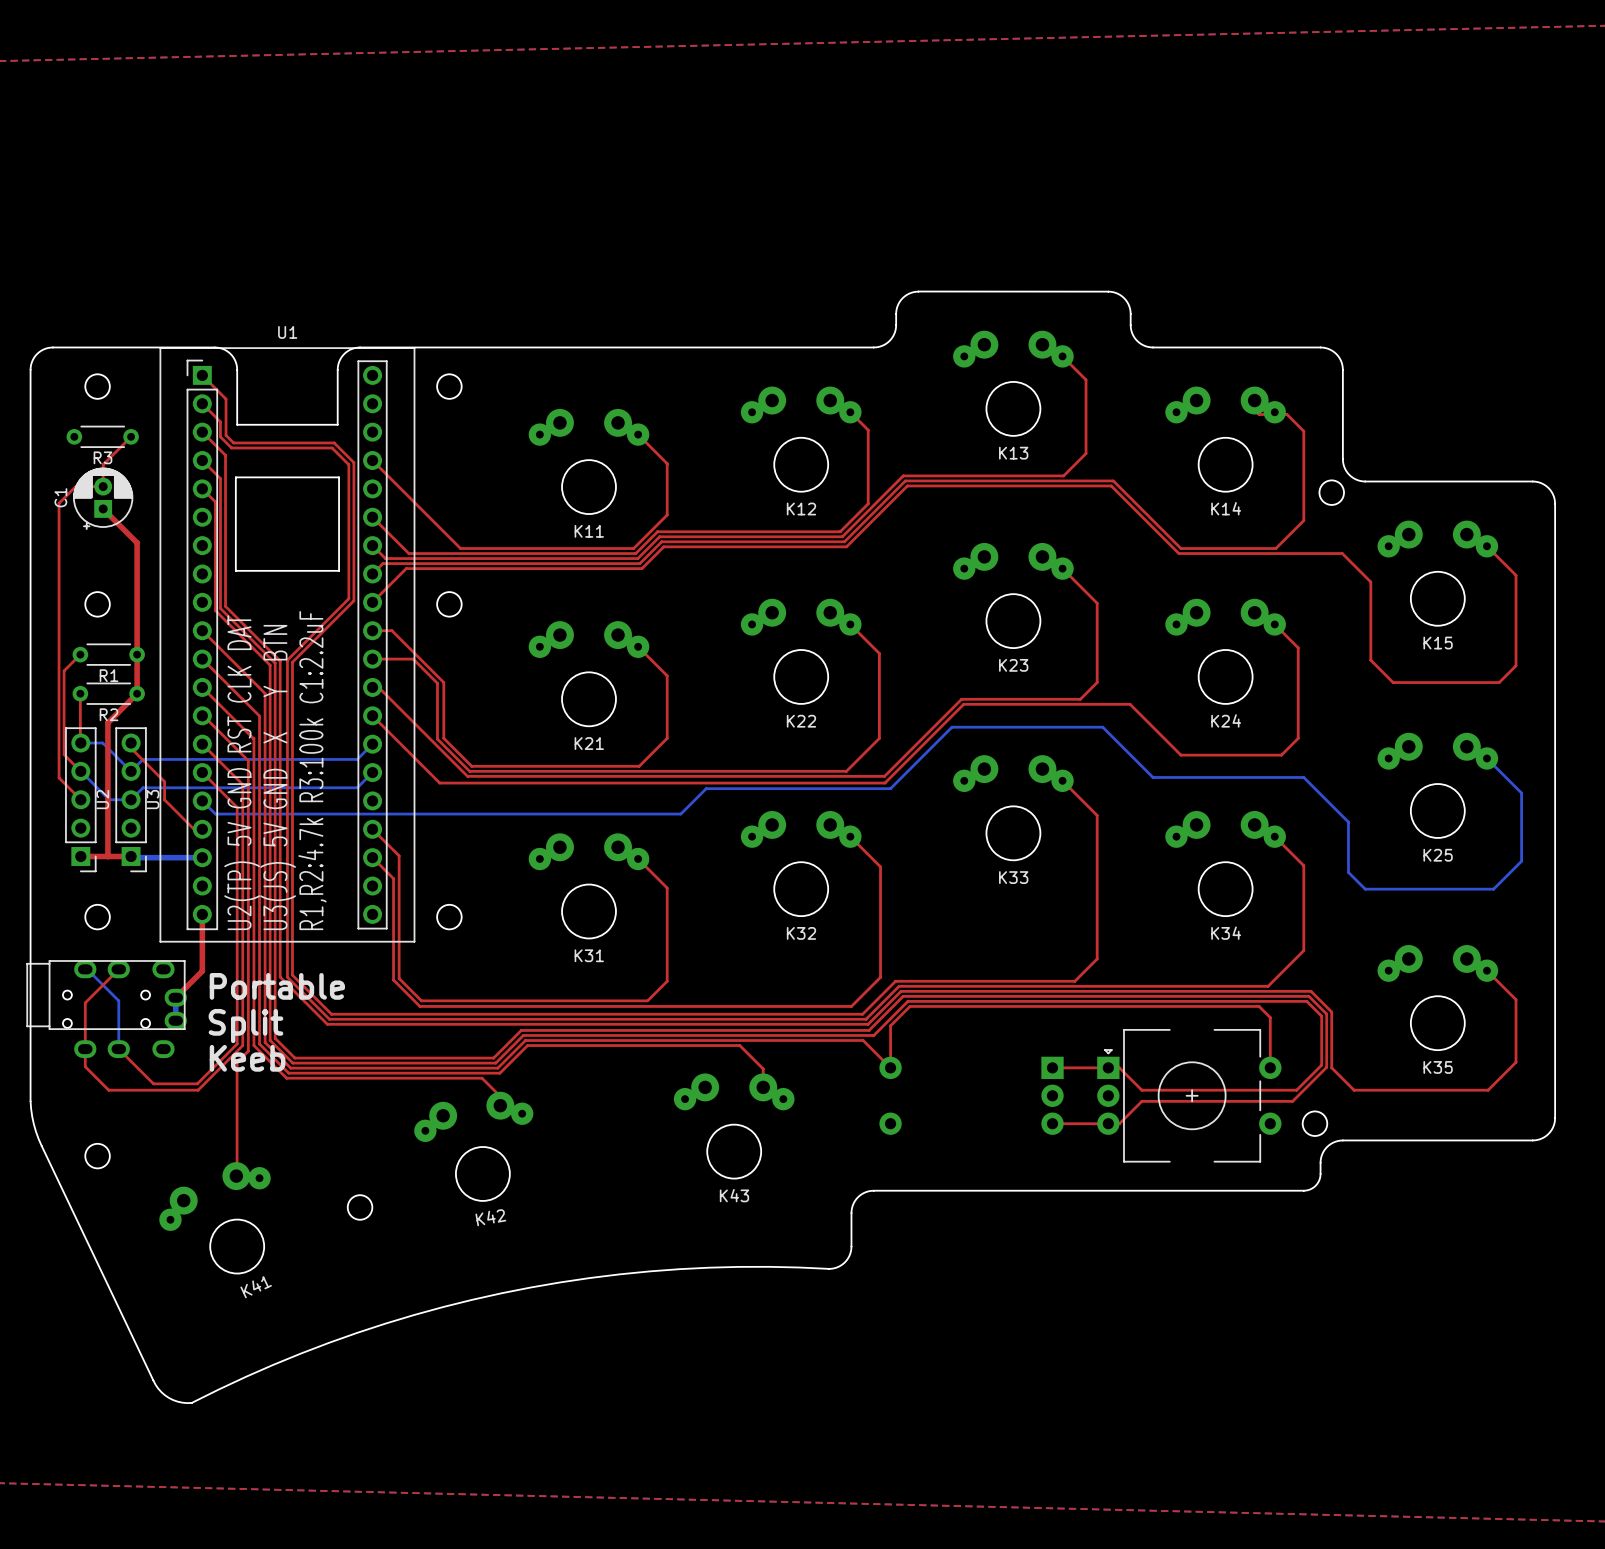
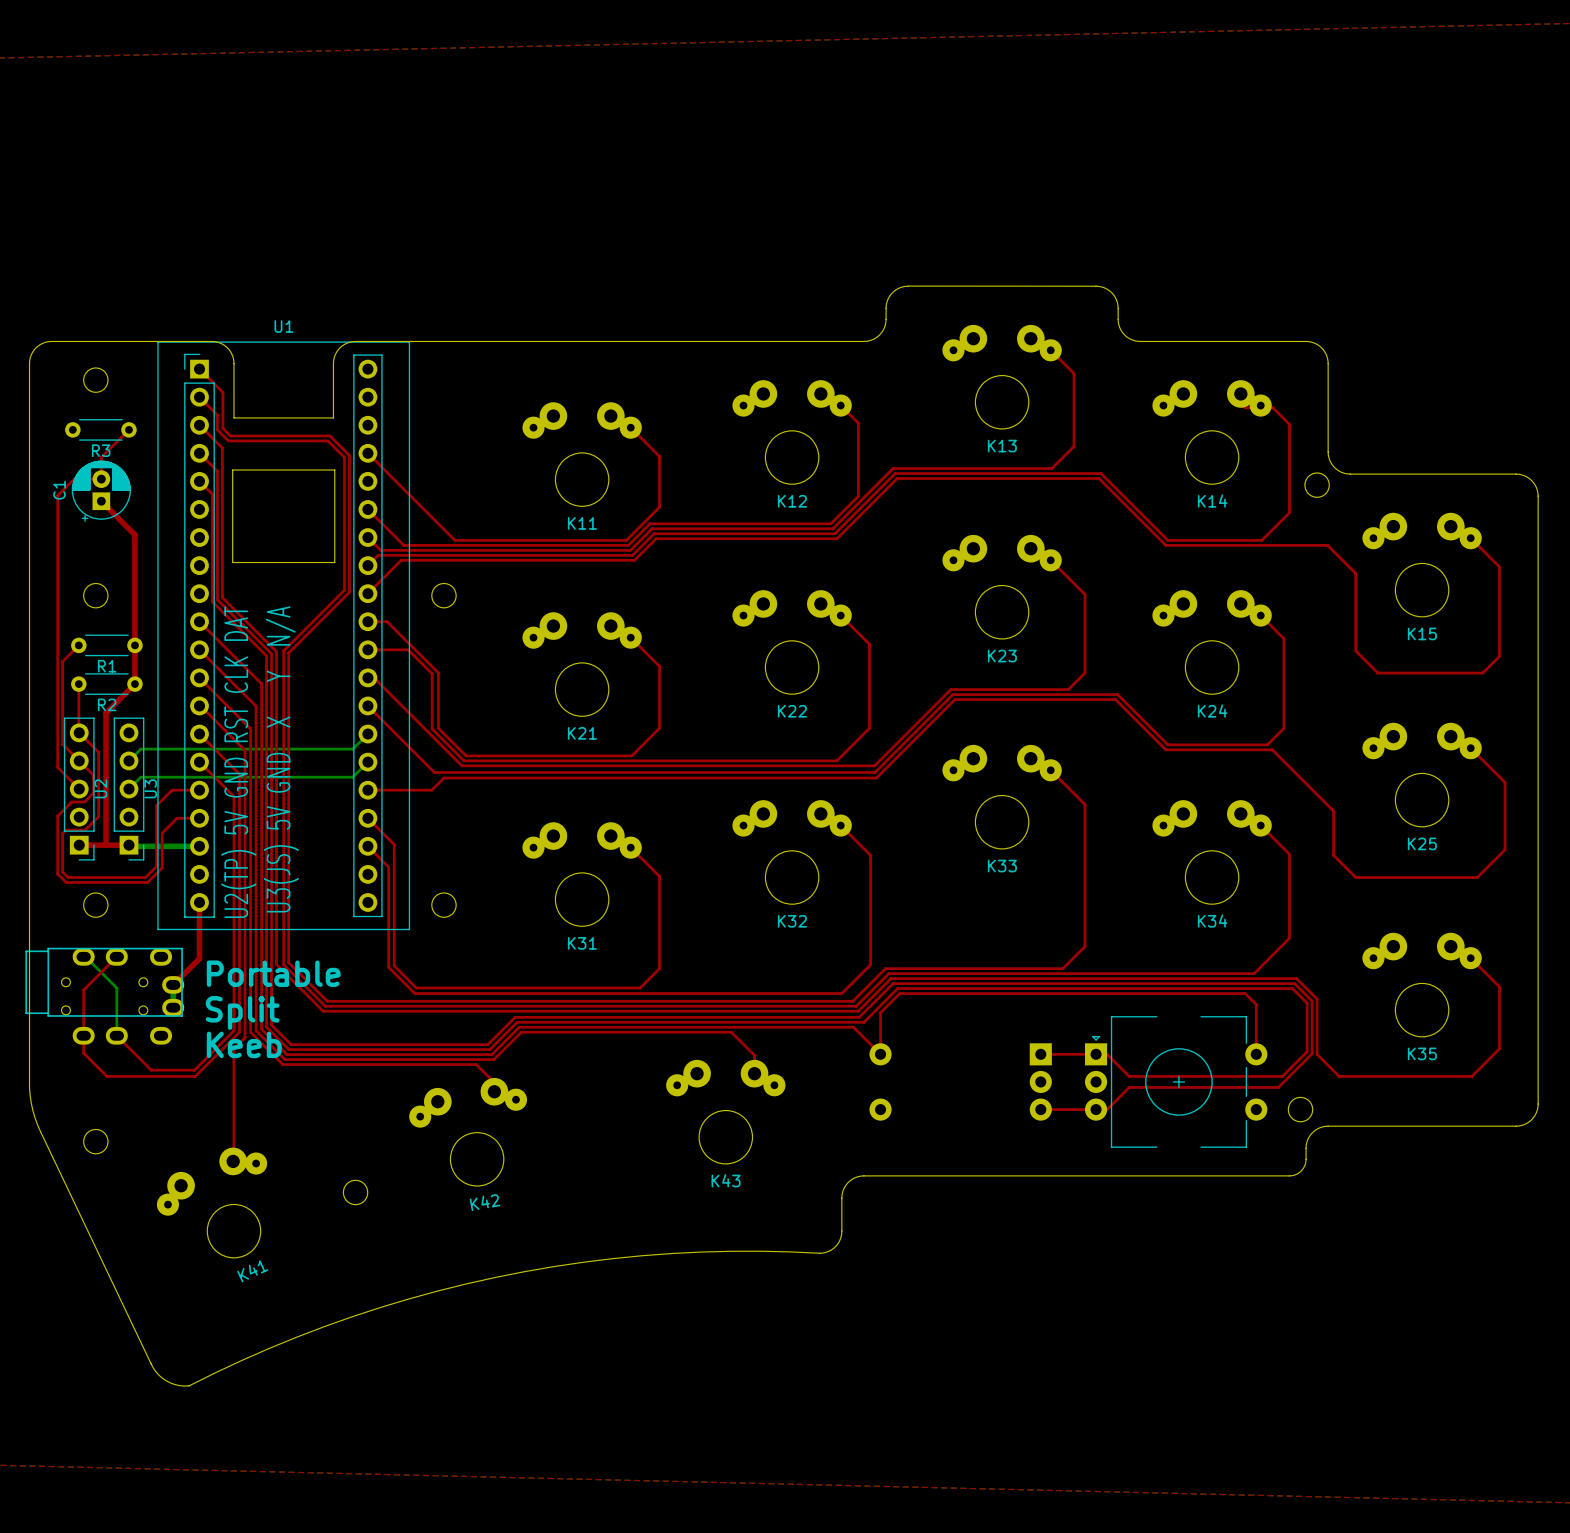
round board edge: [436, 373, 463, 400] -> none
top track: none -> (79, 732) (98, 752) (98, 816) (85, 830) (65, 830) (62, 833) (62, 871) (68, 877) (145, 877) (156, 866) (156, 805) (172, 790) (199, 790)
bottom track: (80, 743) (102, 743) (131, 771) -> none
top track: (131, 743) (131, 748) (164, 781) (164, 799) (194, 829) -> (79, 760) (93, 775) (93, 793) (84, 802) (71, 802) (57, 816) (57, 874) (66, 882) (147, 882) (162, 867) (162, 833) (177, 818) (191, 818)
top track: none -> (1470, 748) (1504, 782) (1504, 849) (1477, 877) (1355, 877) (1333, 855) (1333, 811) (1272, 749) (1165, 749) (1115, 699) (954, 699) (876, 778) (443, 778) (431, 790) (367, 790)
bottom track: (1486, 758) (1521, 793) (1521, 861) (1493, 889) (1365, 889) (1348, 872) (1348, 822) (1303, 777) (1153, 777) (1102, 727) (951, 727) (890, 788) (706, 788) (680, 814) (215, 814) (202, 800) -> none
text: R1,R2:4.7k R3:100k C1:2.2uF (312, 770) -> none
bottom track: (80, 771) (109, 799) (131, 799) -> none
text: U3(JS) 5V GND X Y BTN (278, 777) -> U3(JS) 5V GND X Y N/A (281, 759)

